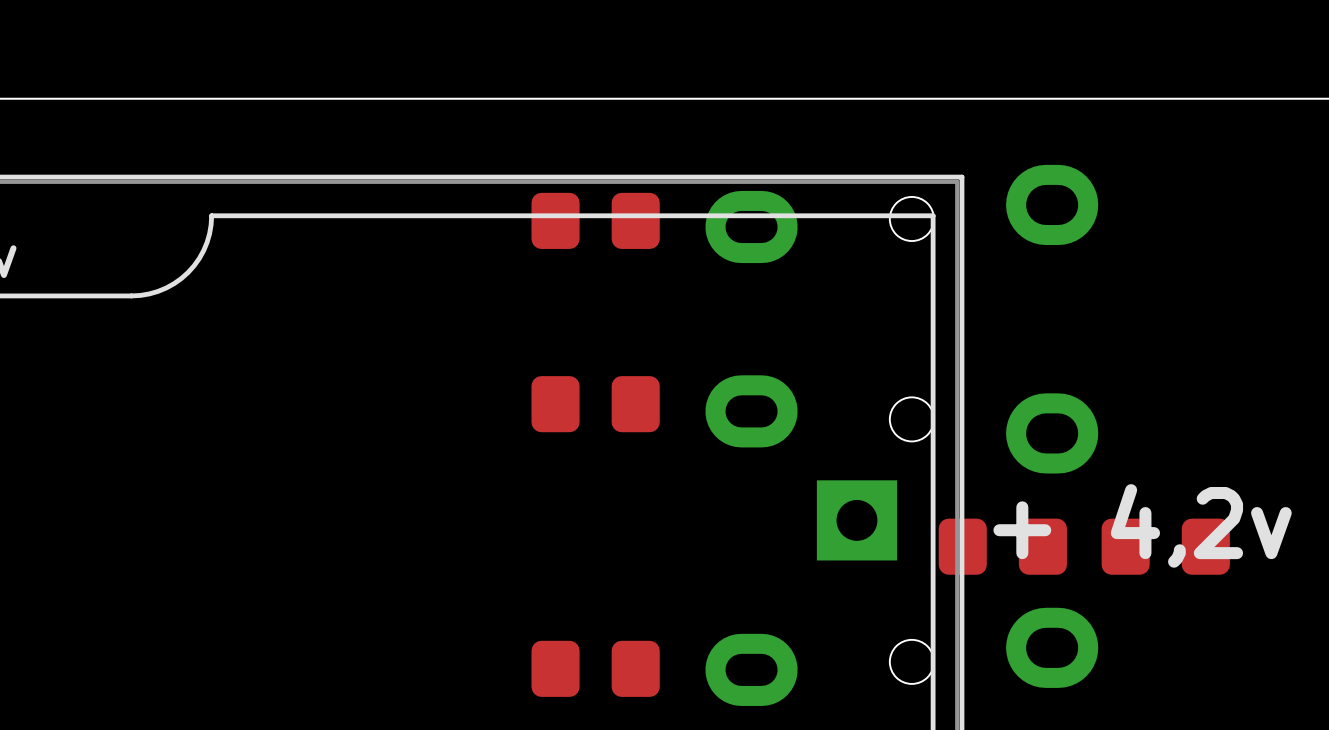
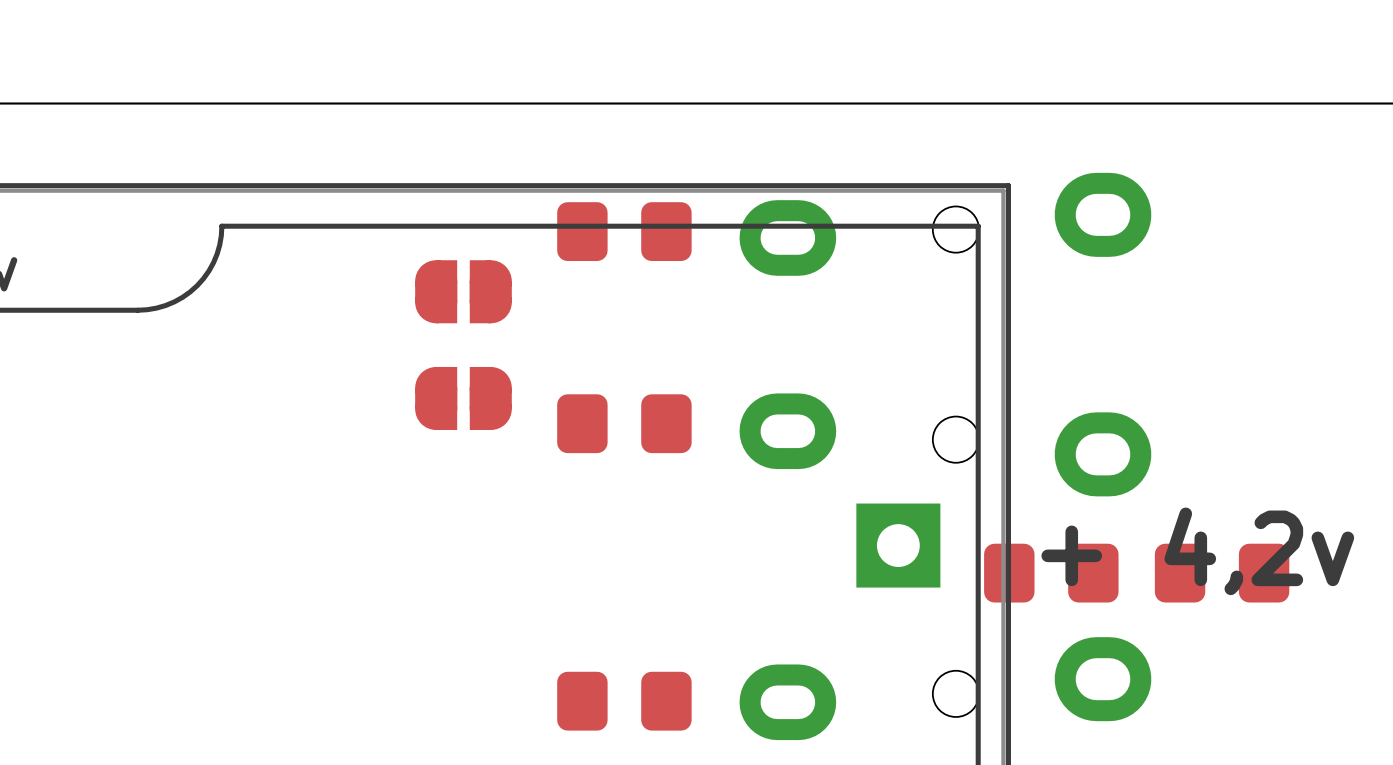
part: none -> (463, 291)
part: none -> (463, 398)

